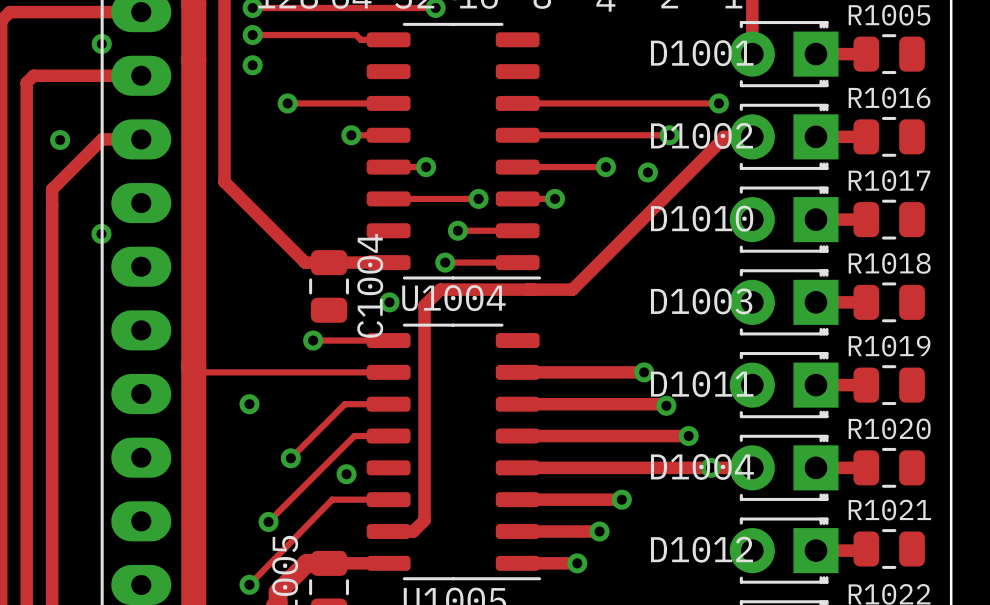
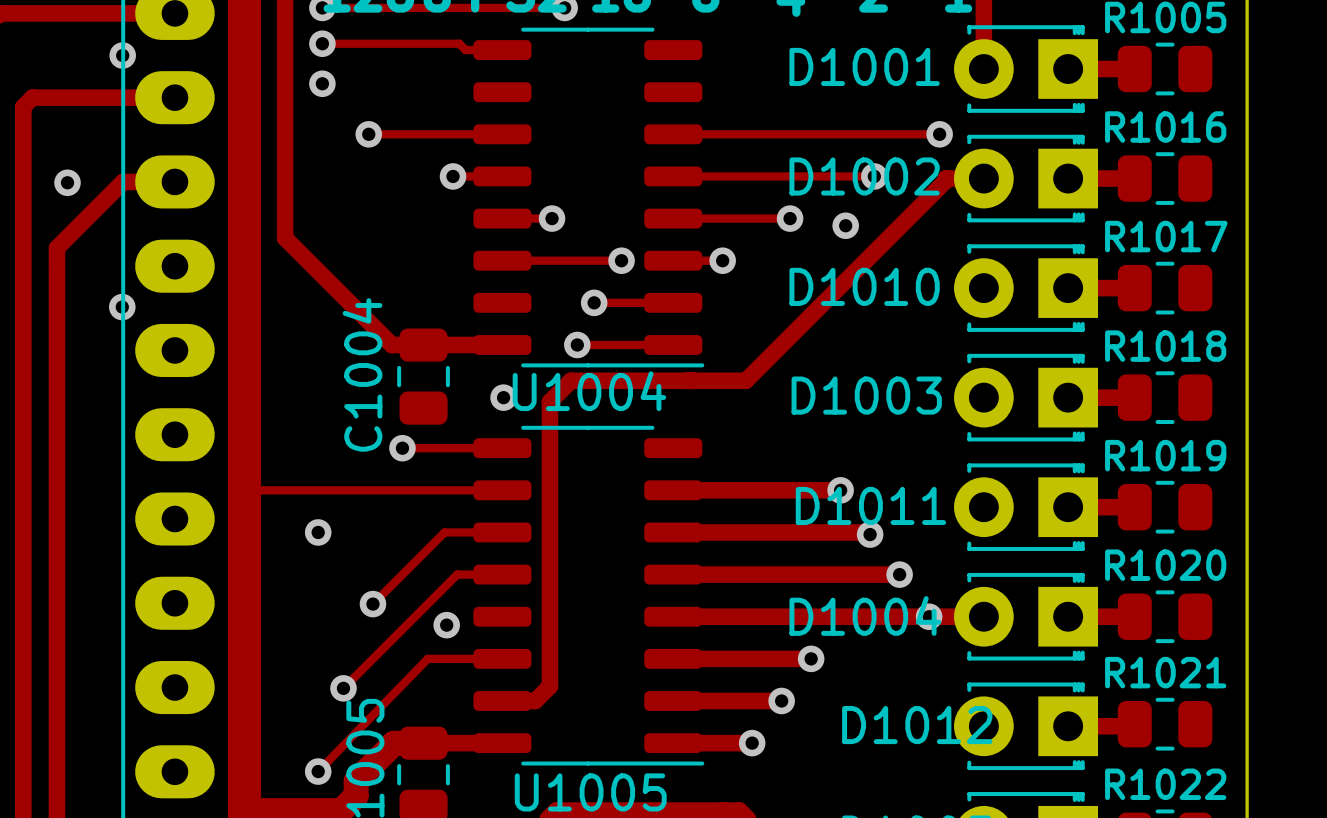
D1001 name position: D1001 (702, 53) -> D1001 (864, 66)
D1002 name position: D1002 (701, 135) -> D1002 (864, 176)
D1010 name position: D1010 (702, 218) -> D1010 (864, 286)
C1004 name position: C1004 (370, 285) -> C1004 (362, 374)
D1003 name position: D1003 (701, 301) -> D1003 (866, 395)
D1011 name position: D1011 (702, 384) -> D1011 (870, 505)
D1004 name position: D1004 (702, 466) -> D1004 (865, 615)

